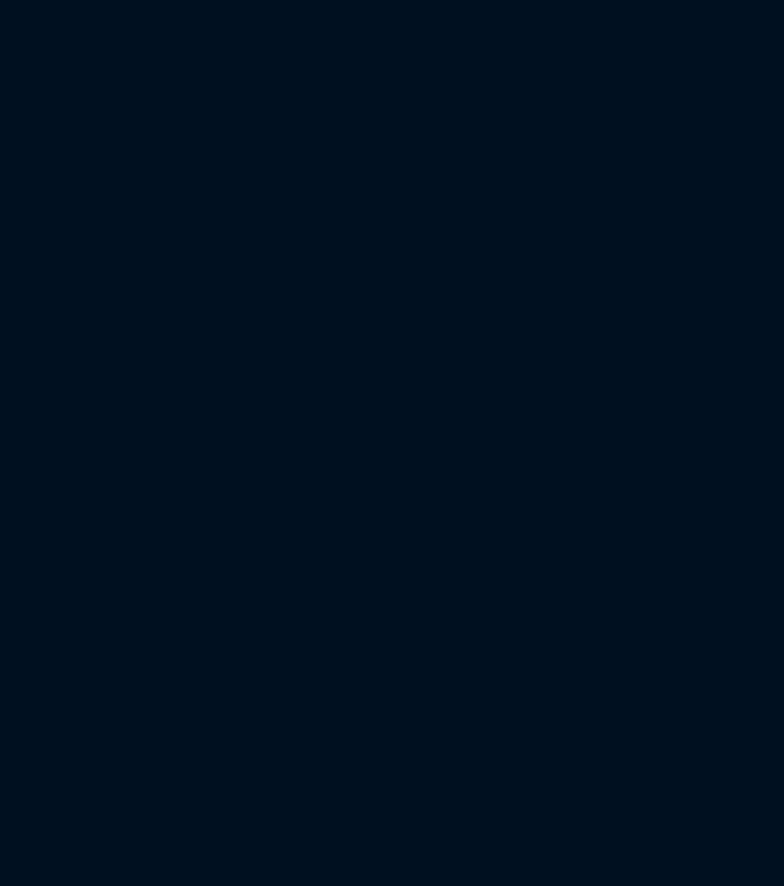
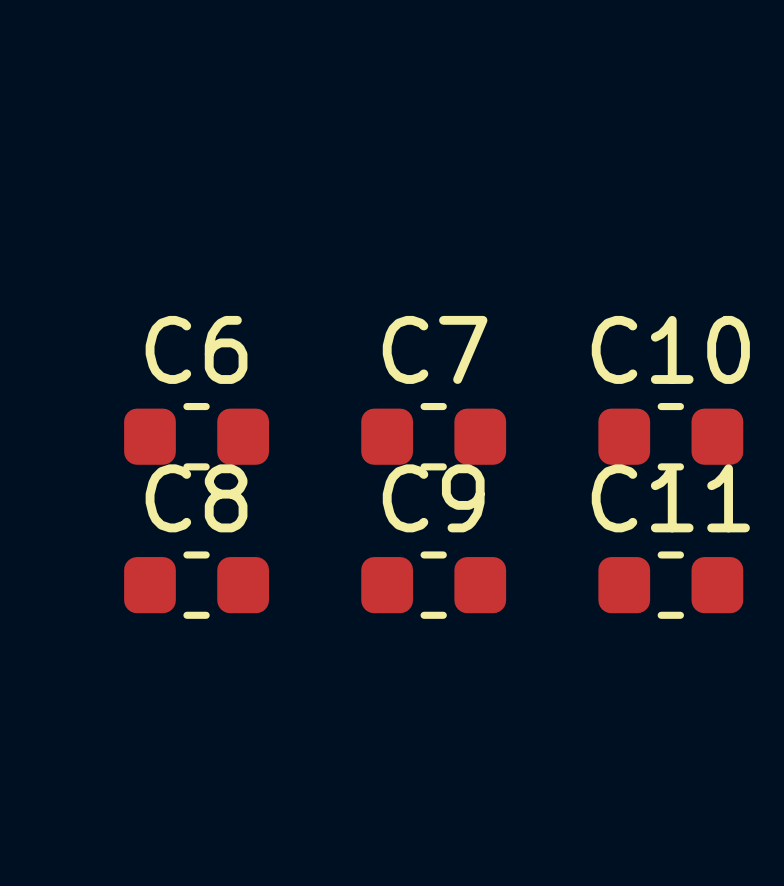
C6: none -> (196, 436)
C7: none -> (433, 436)
C10: none -> (670, 436)
C8: none -> (196, 585)
C9: none -> (433, 585)
C11: none -> (670, 585)

